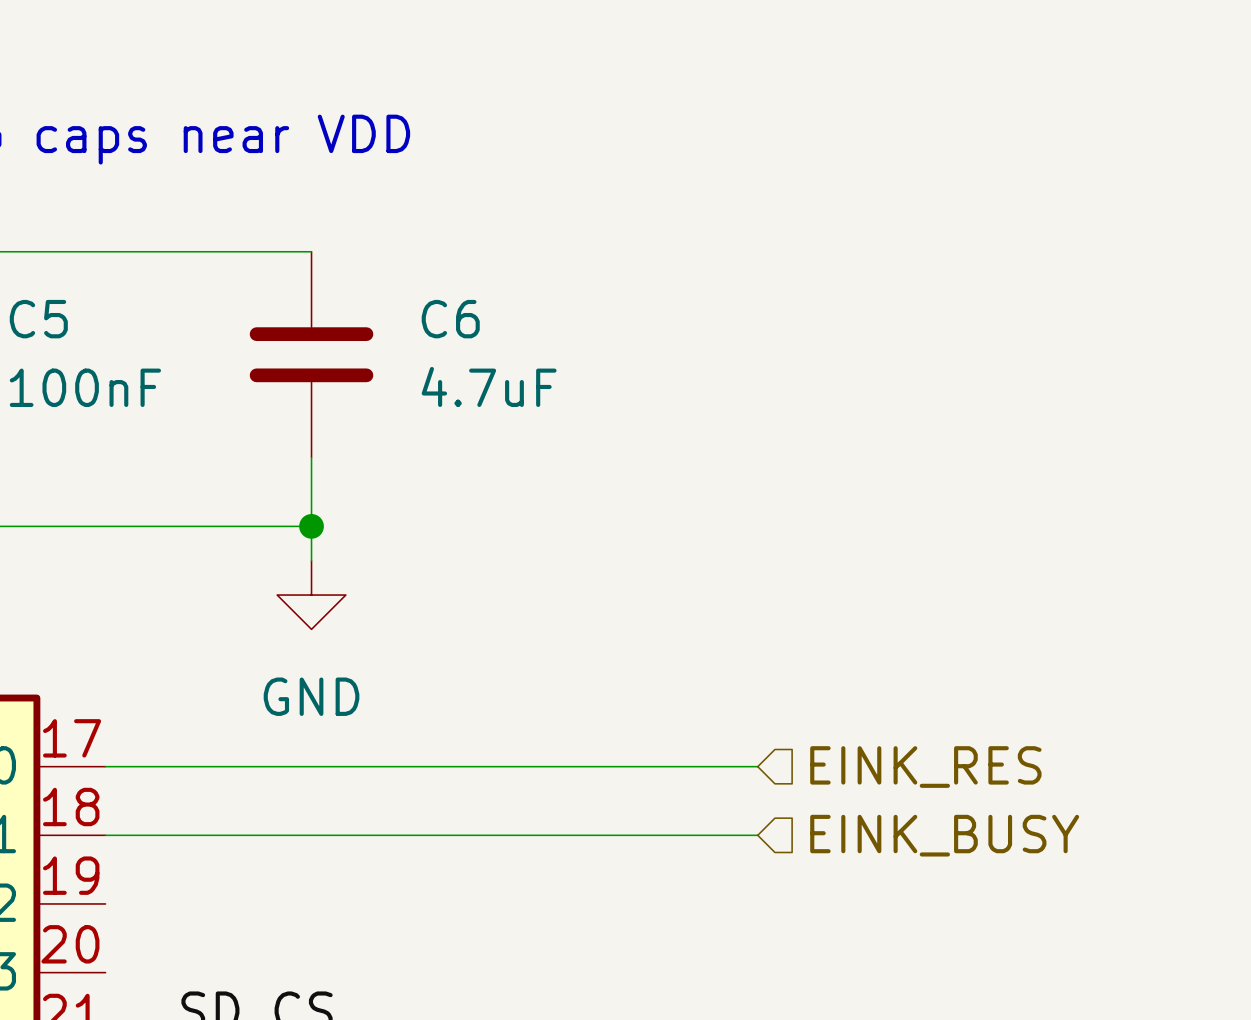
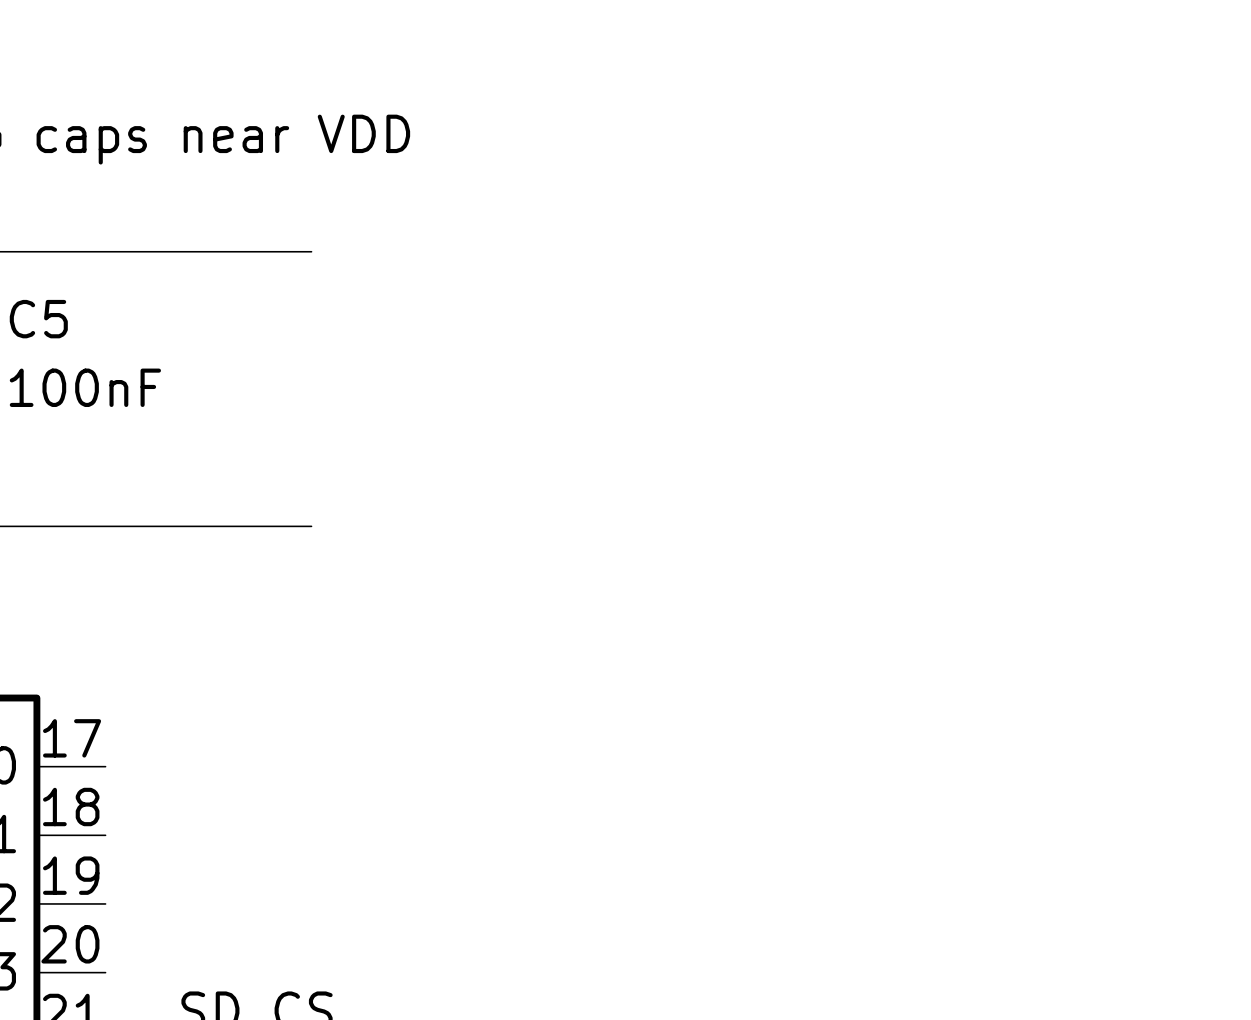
C6: 4.7uF (311, 354) -> none
wire: (311, 457) (311, 560) -> none
junction: (311, 526) -> none
power symbol: GND (311, 595) -> none
wire: (105, 766) (757, 766) -> none
hierarchical label: EINK_RES (925, 767) -> none
wire: (105, 835) (757, 835) -> none
hierarchical label: EINK_BUSY (944, 835) -> none

